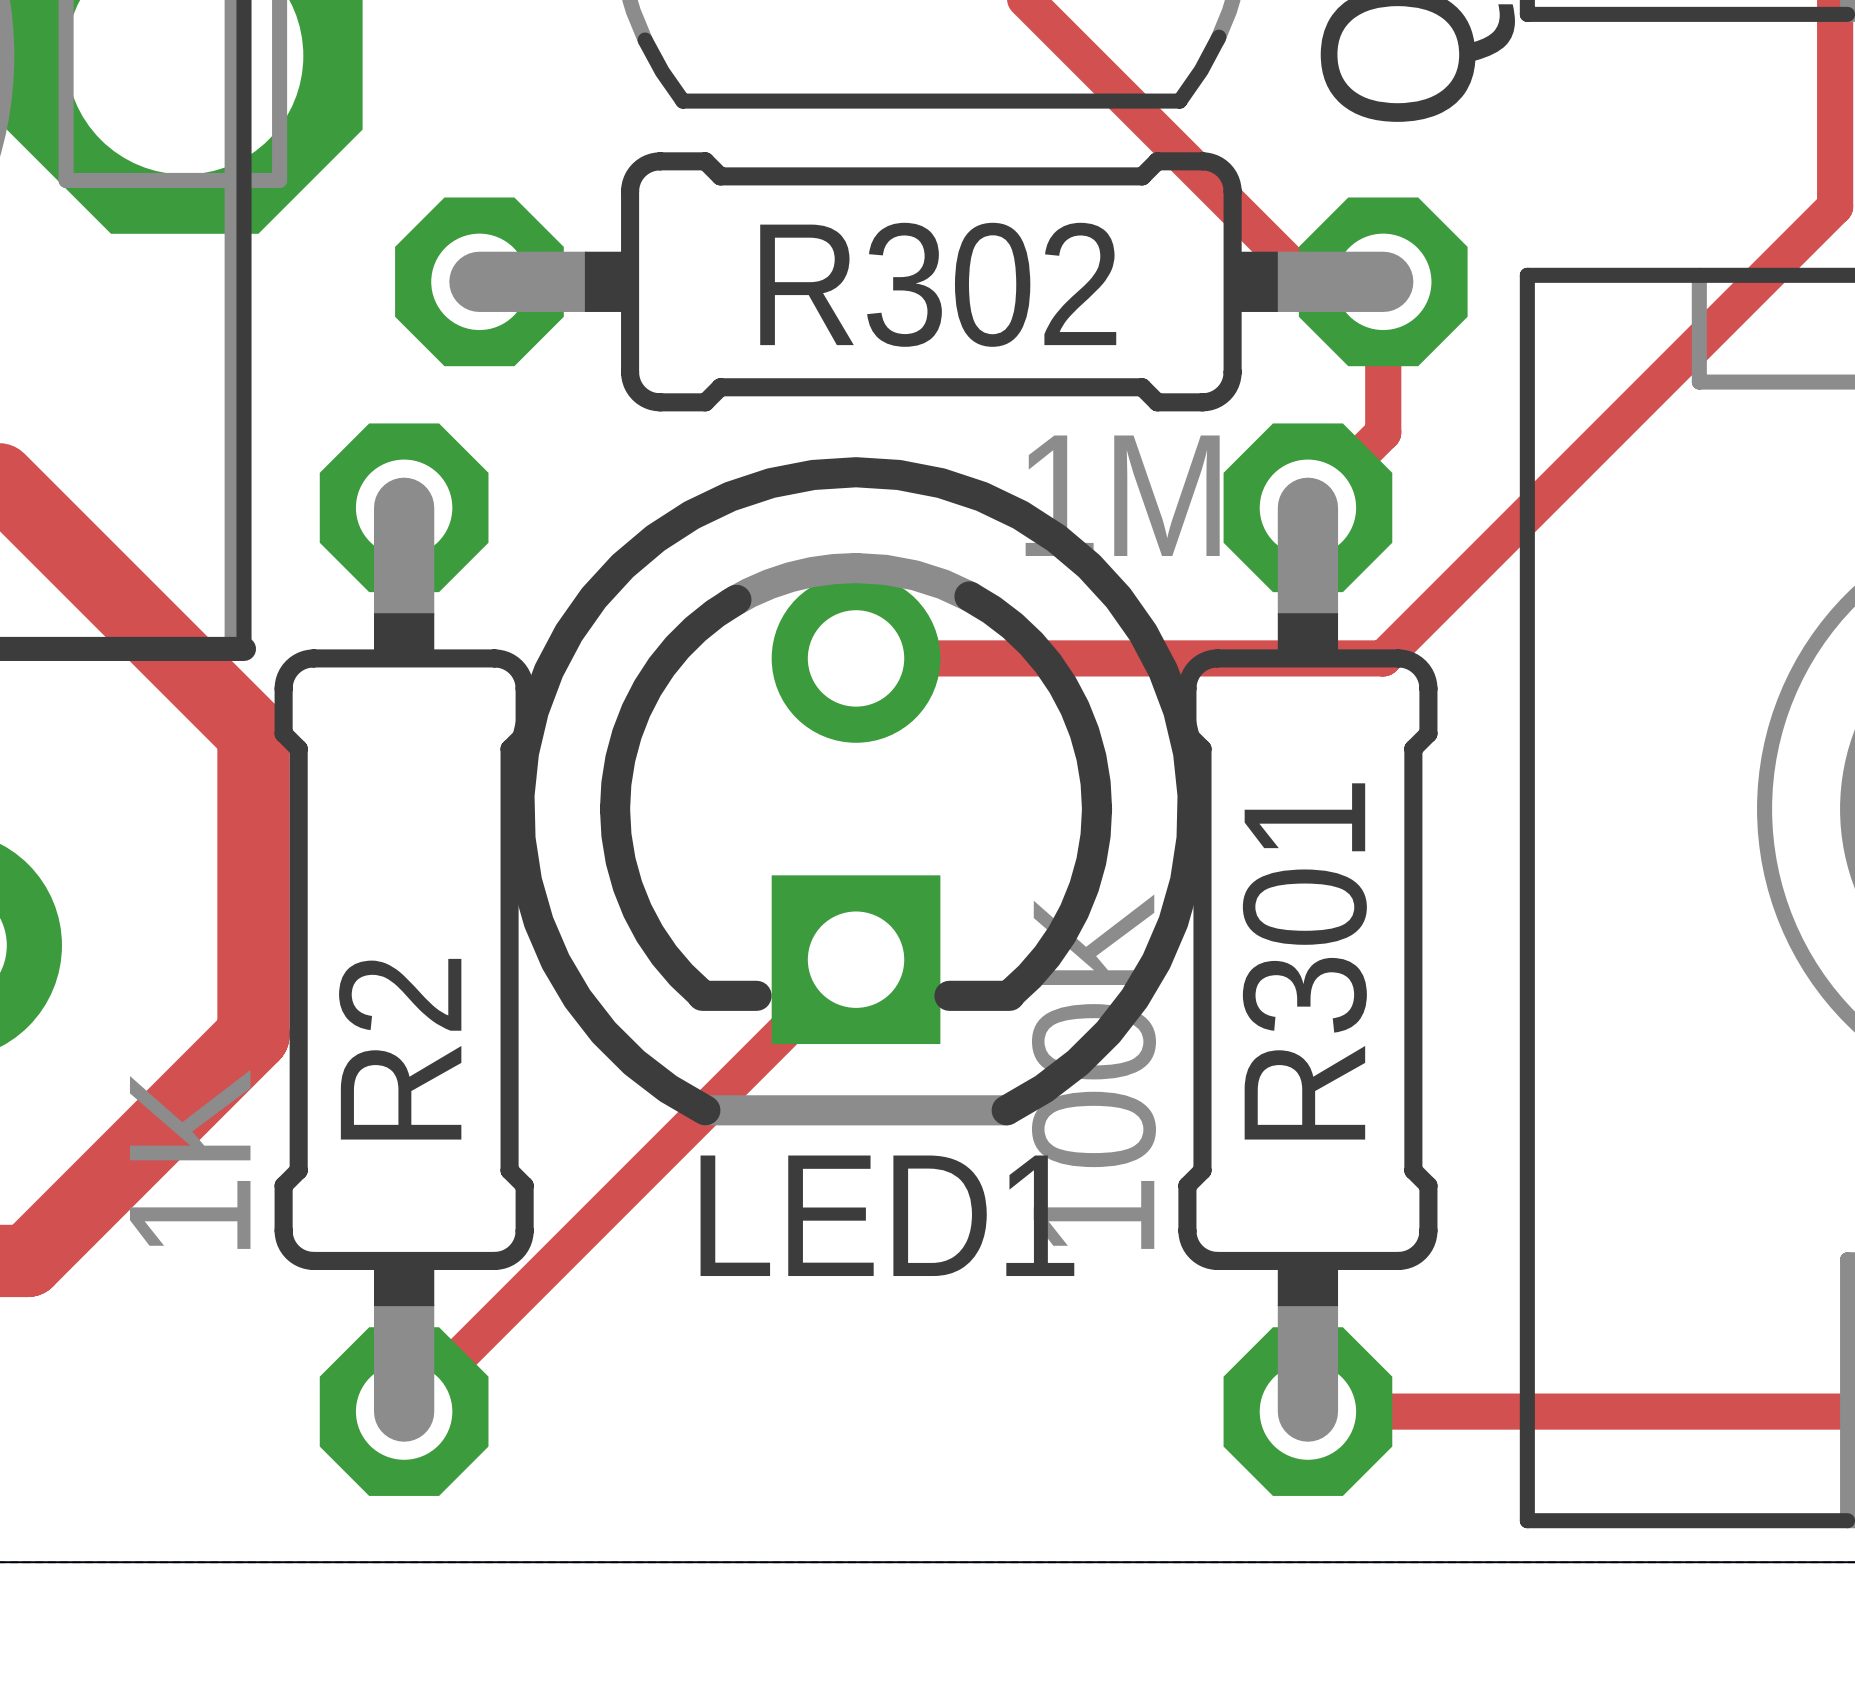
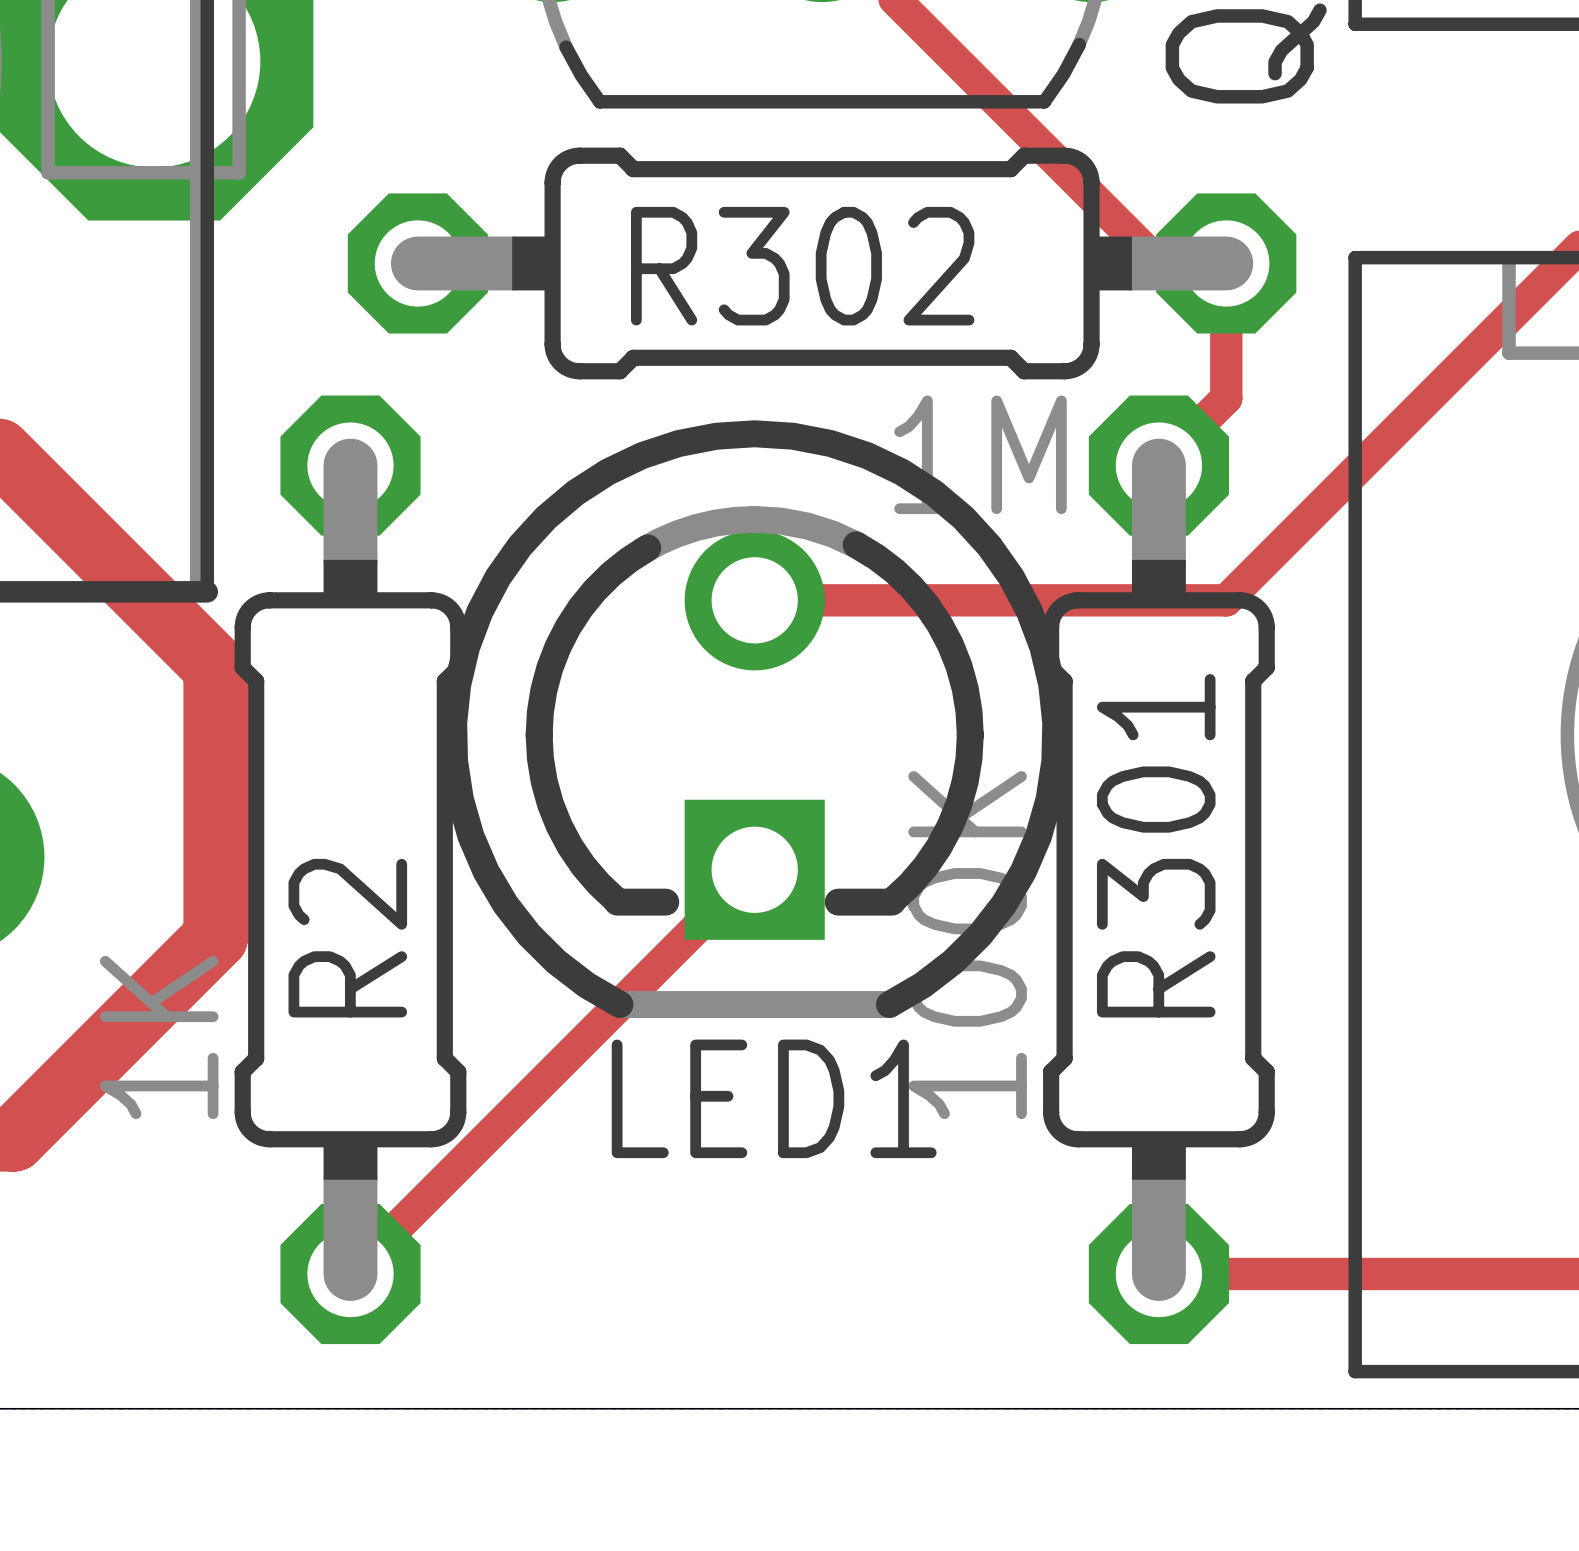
R302 footprint: [395, 152, 1468, 412] -> [347, 147, 1297, 380]
R2 footprint: [274, 423, 534, 1496] -> [234, 395, 467, 1345]
R301 footprint: [1178, 423, 1438, 1496] -> [1043, 395, 1275, 1345]
LED1 footprint: [504, 457, 1208, 1126] -> [440, 420, 1070, 1019]

